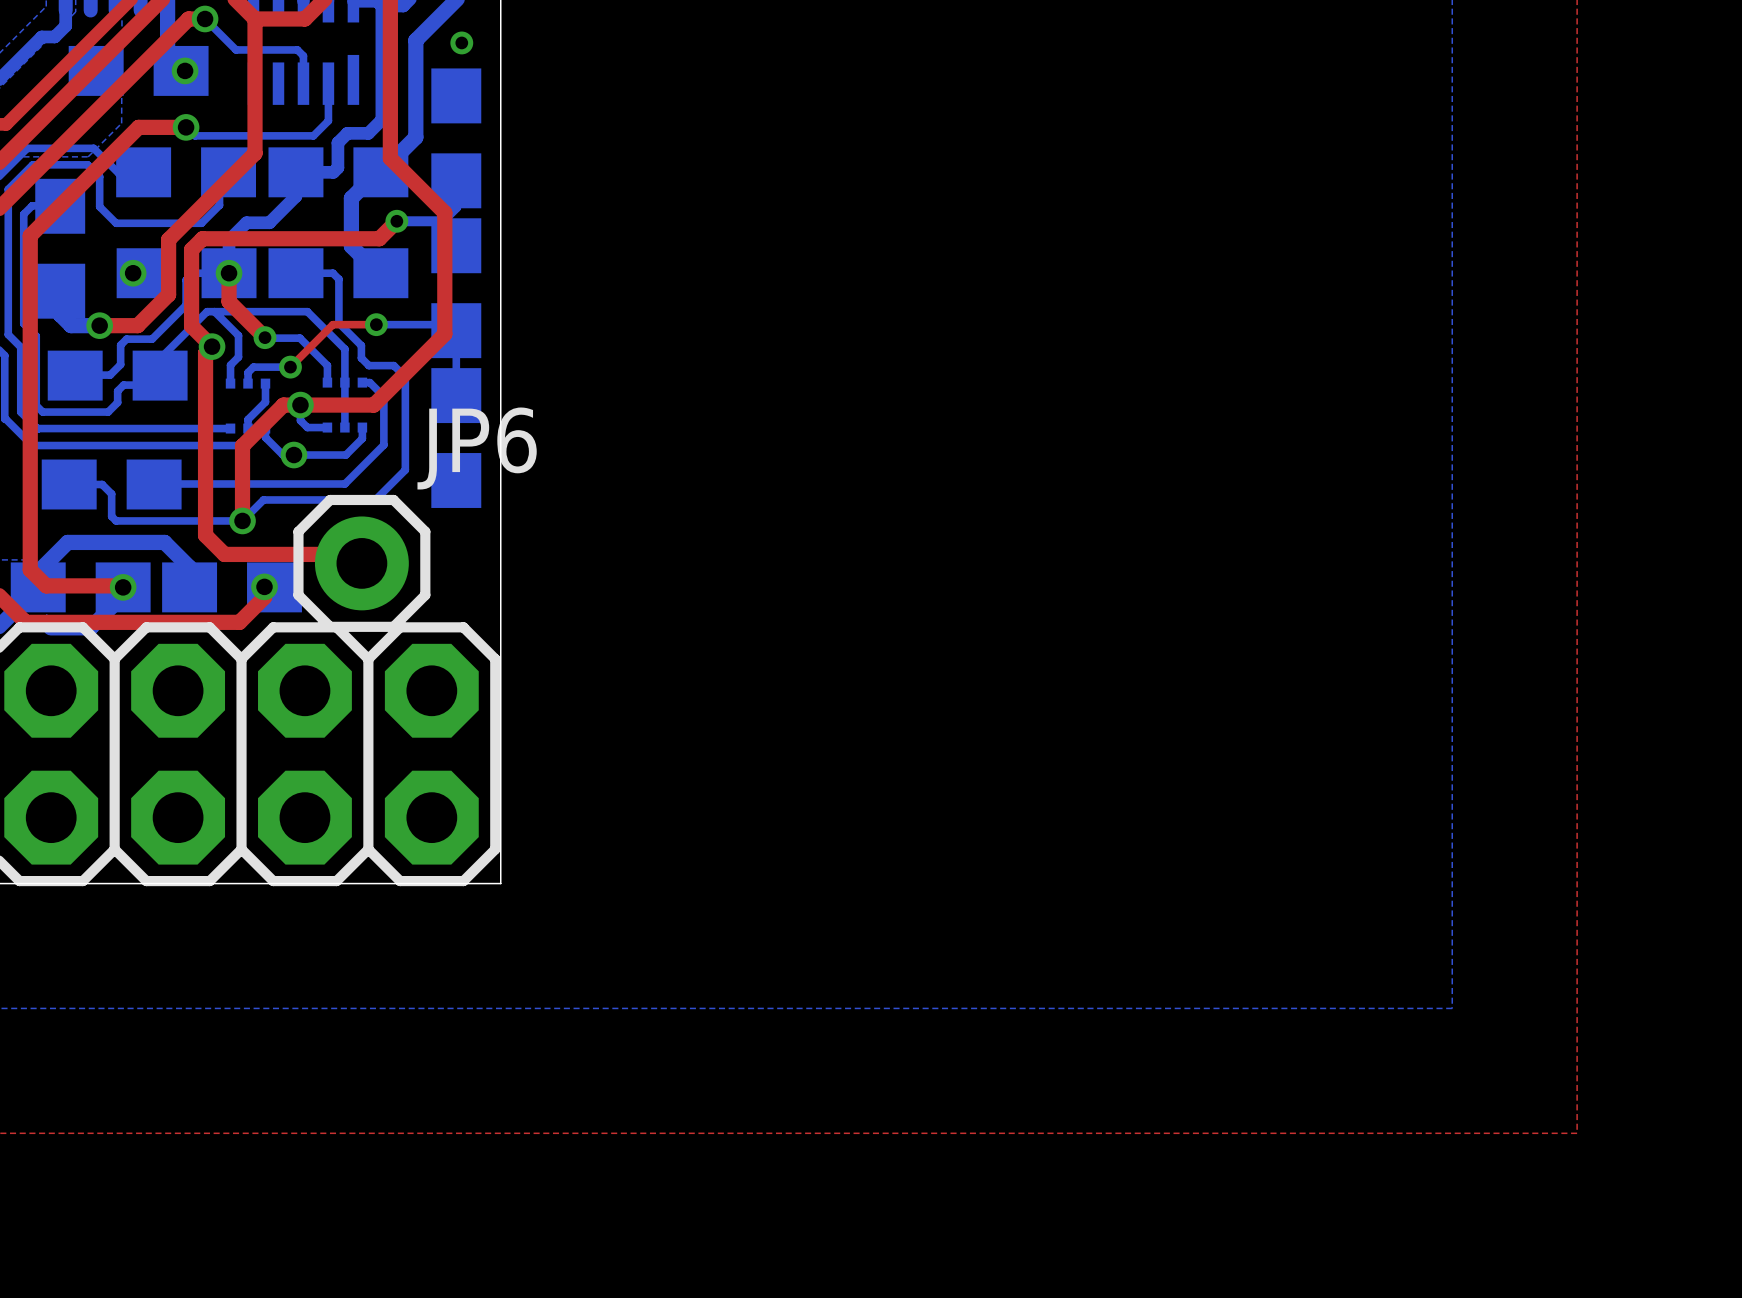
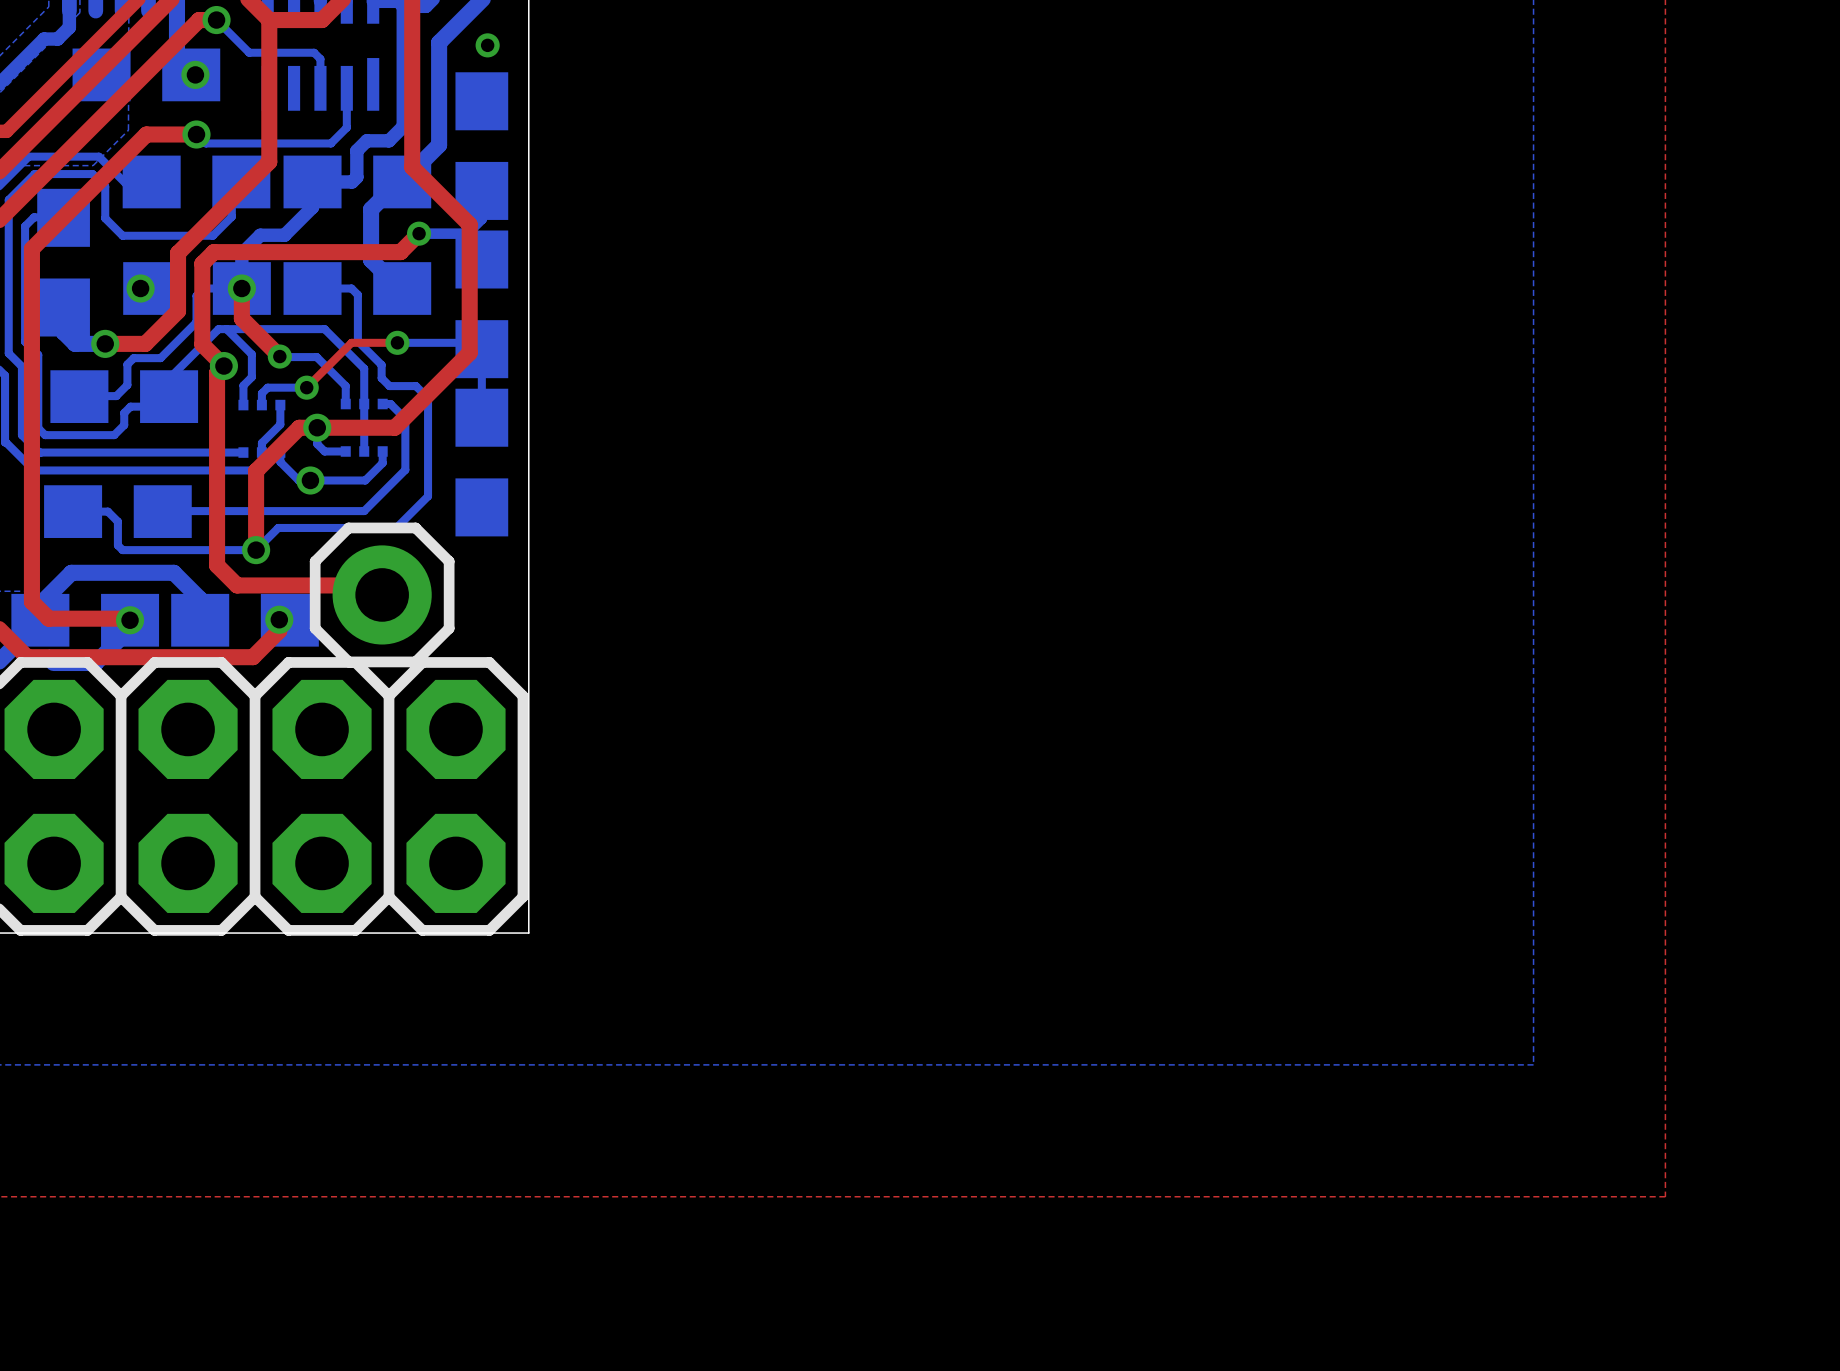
JP6 name: JP6 (477, 448) -> none

